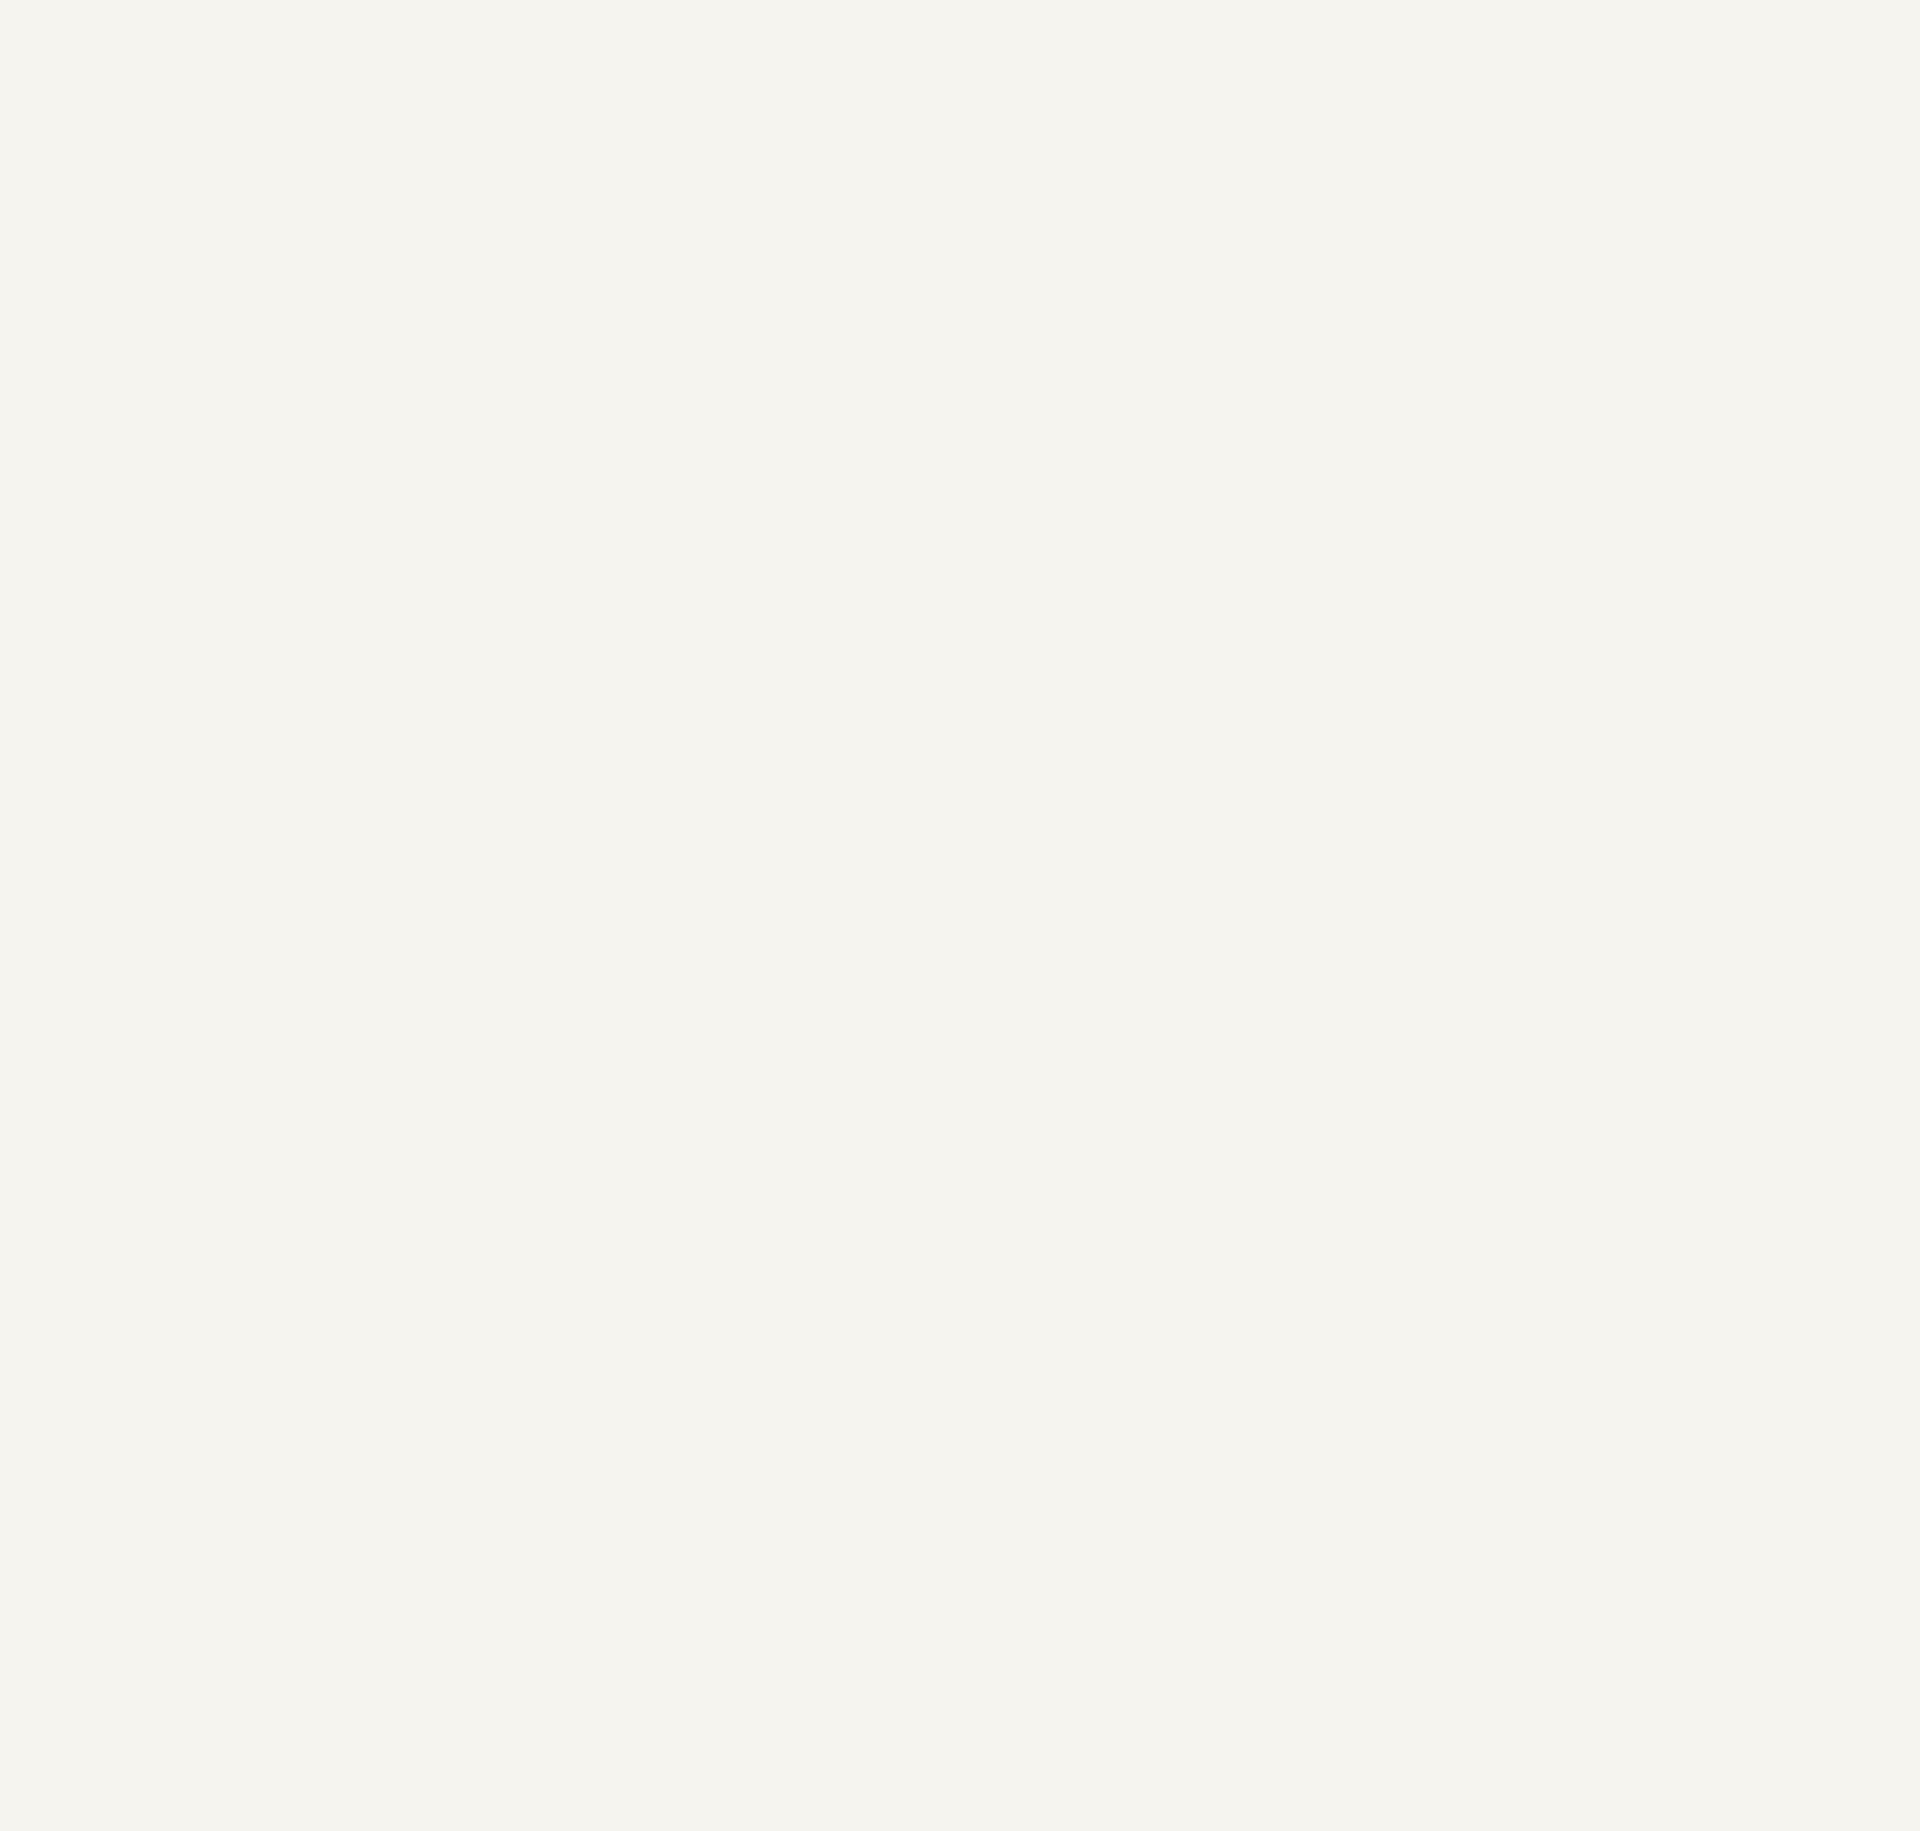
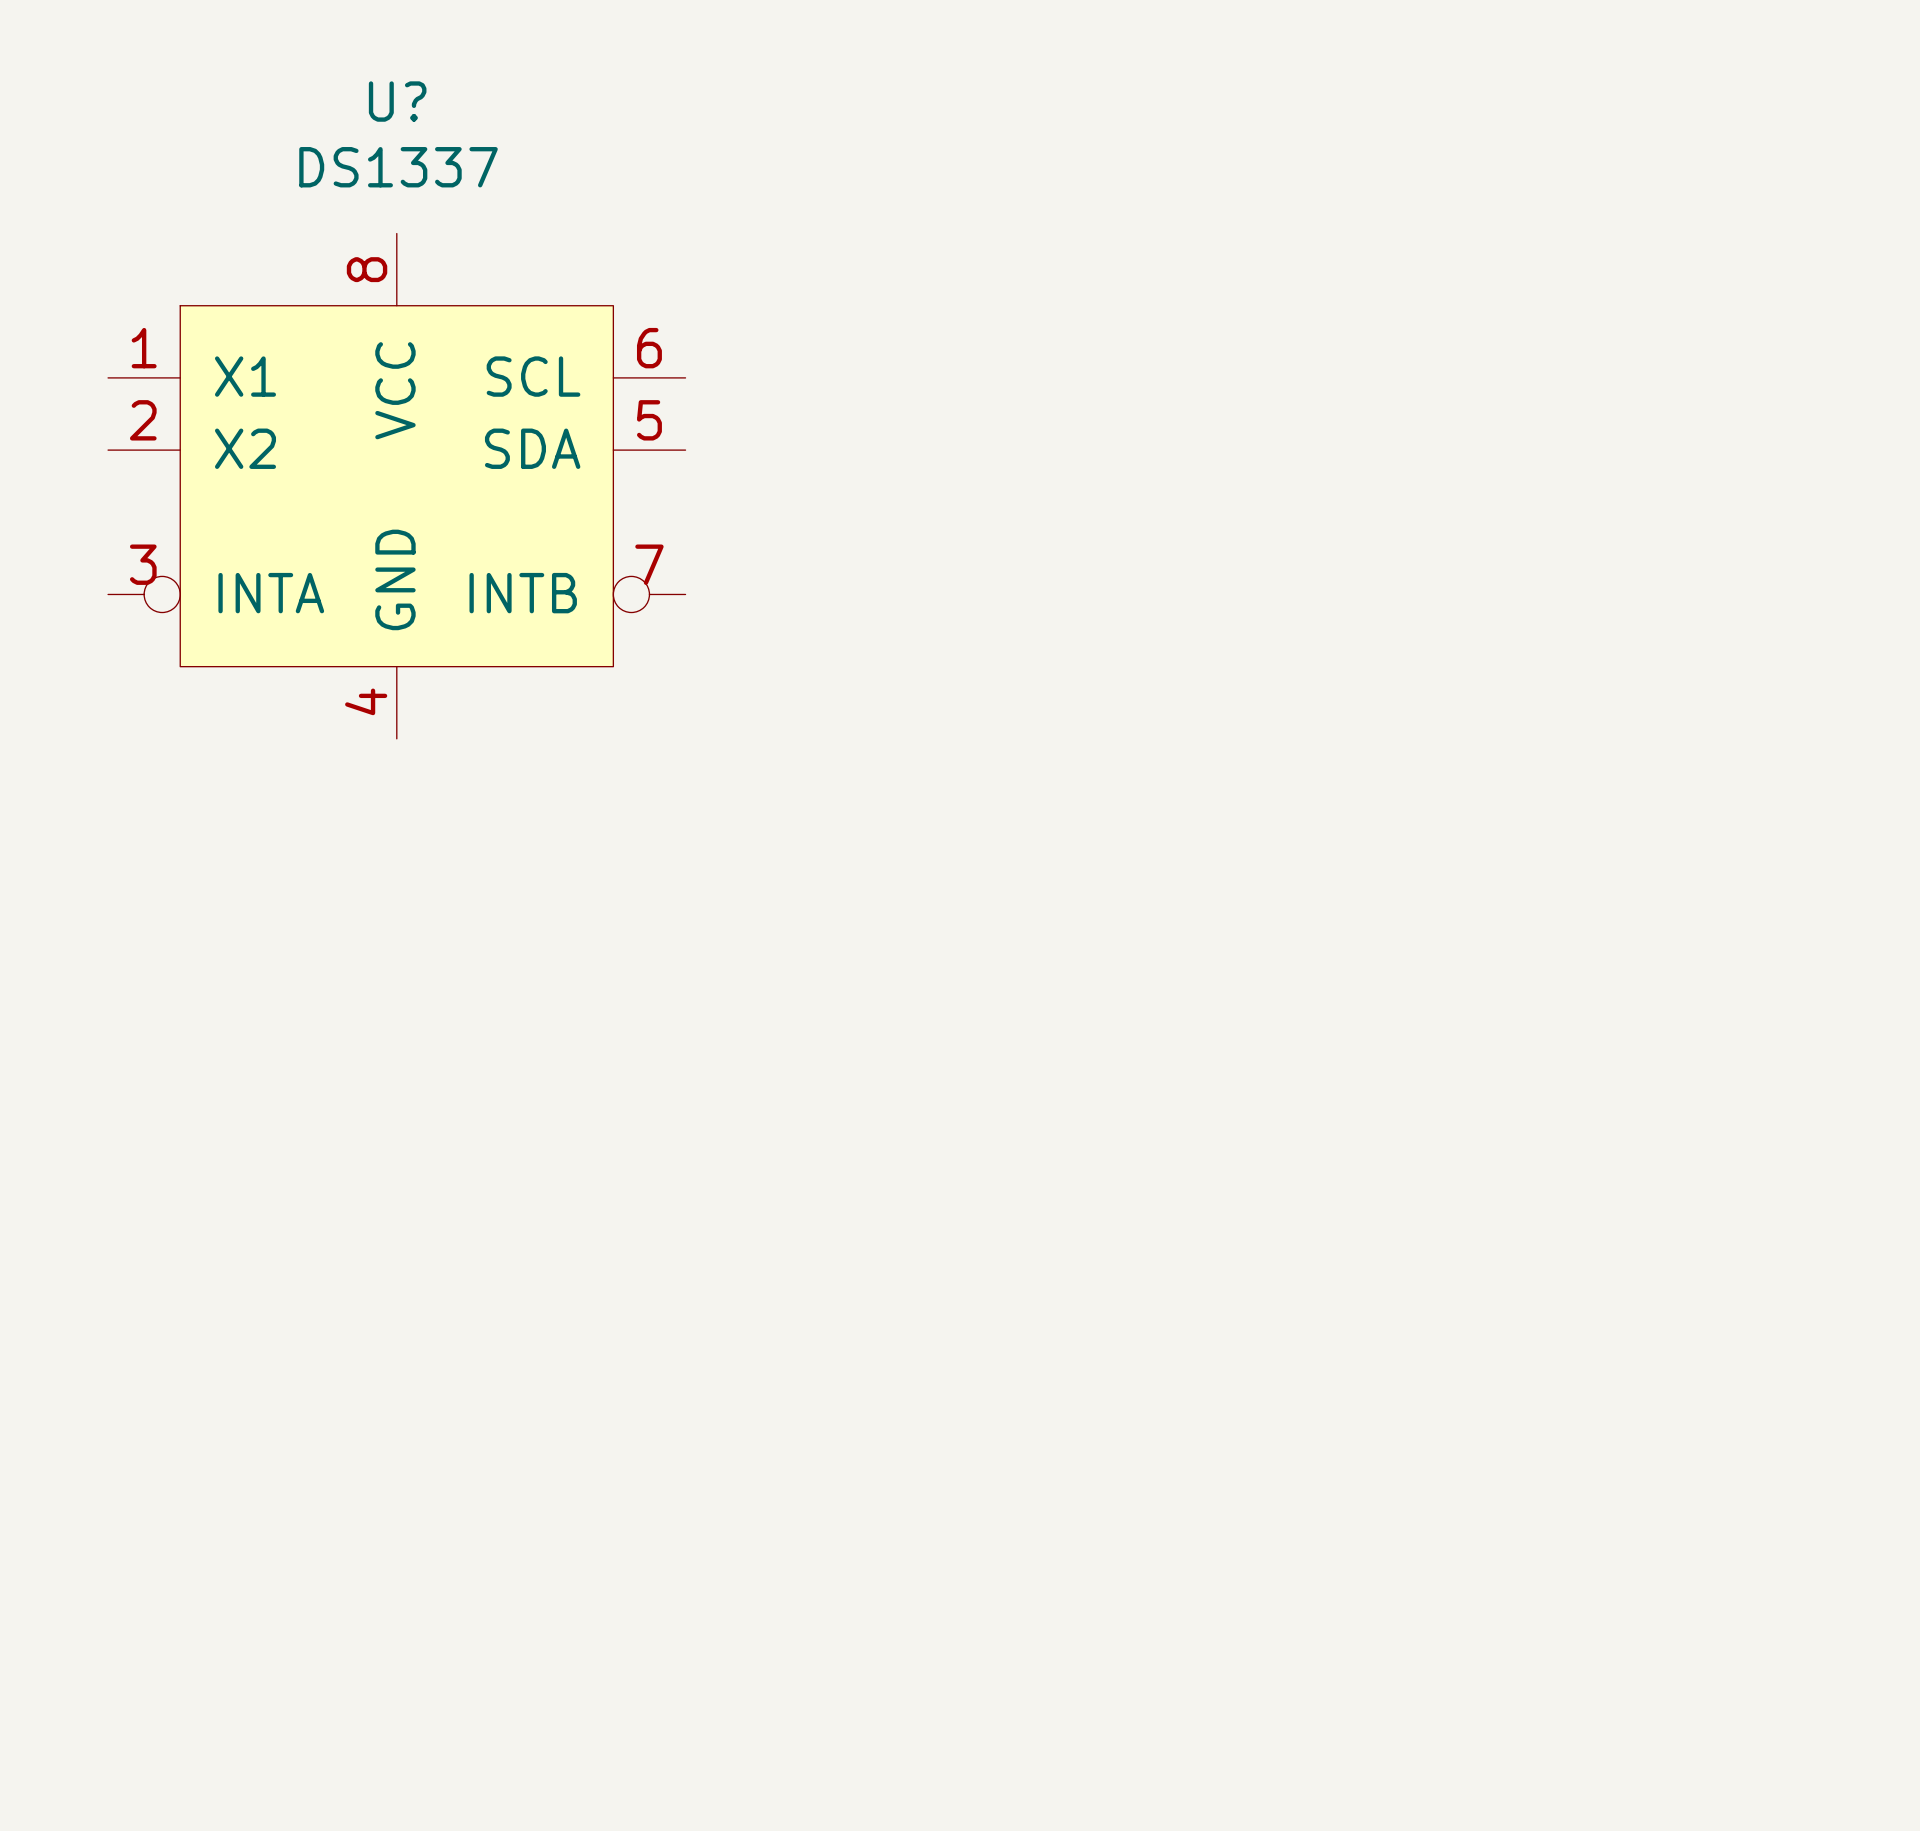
U?: none -> DS1337 (396, 486)

